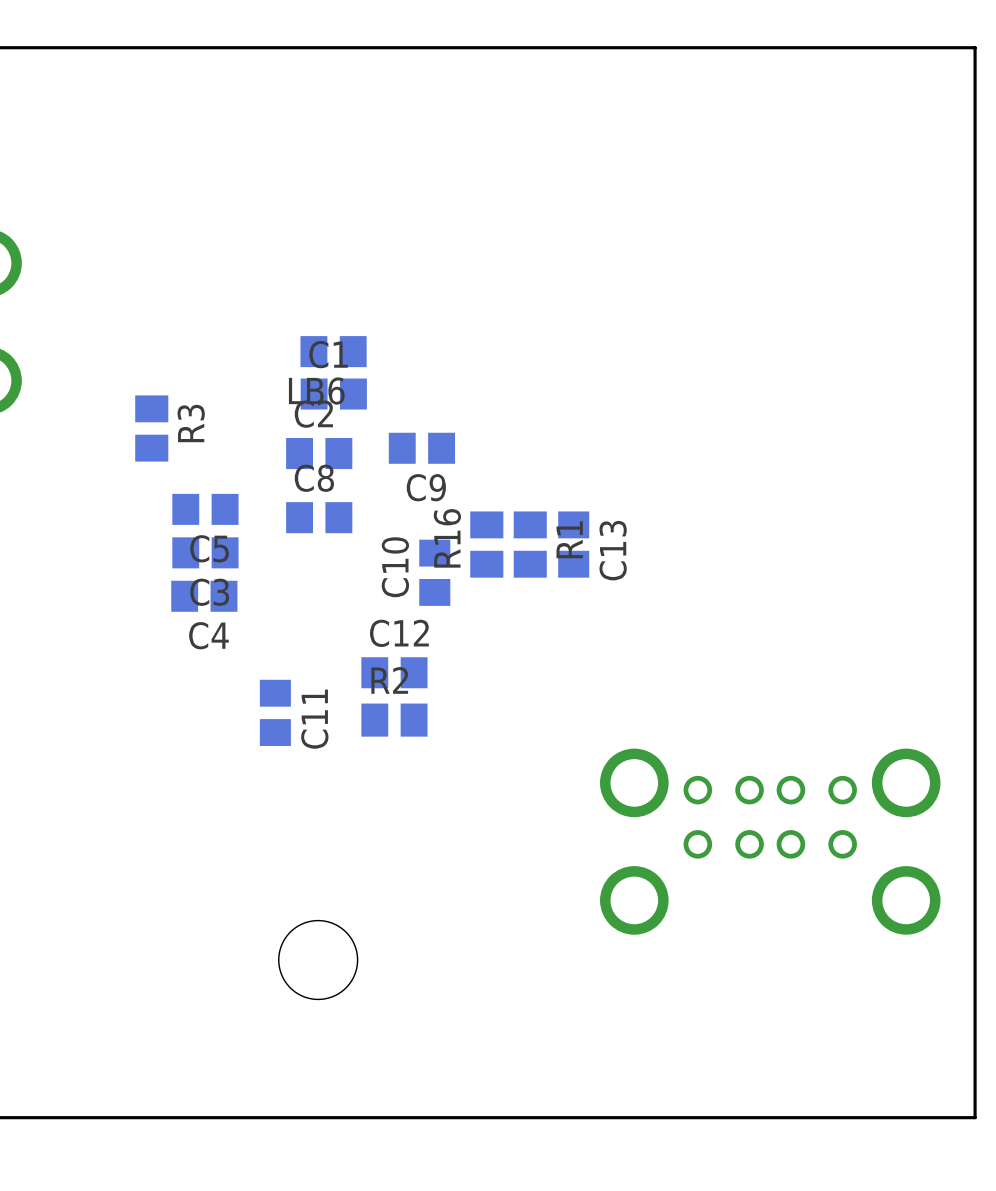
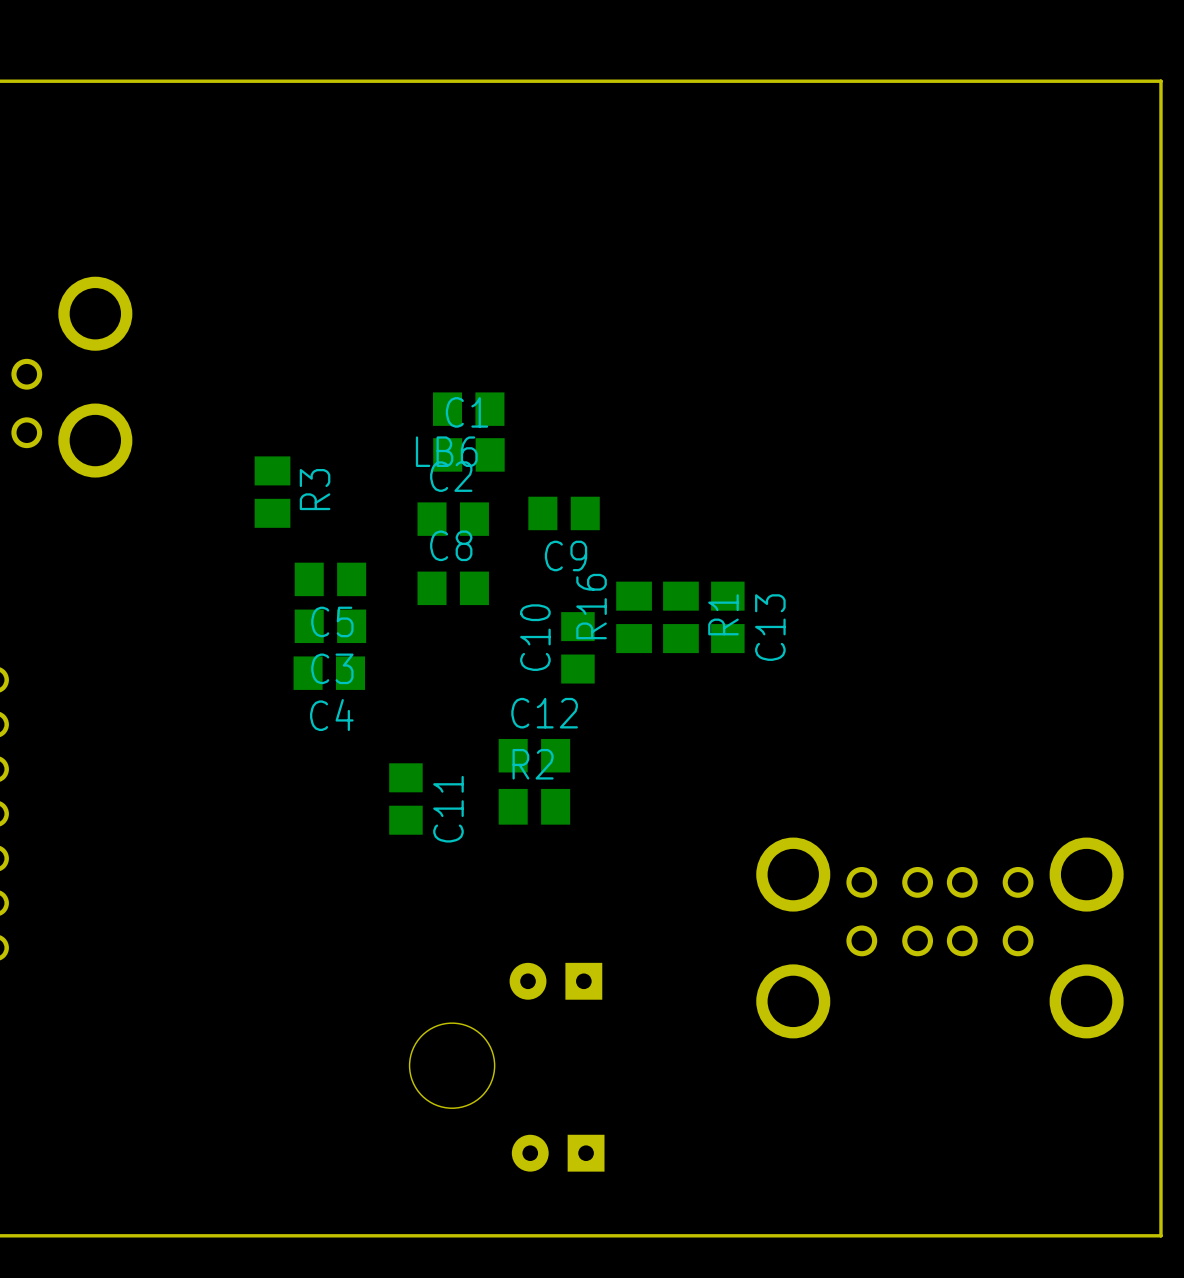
part: none -> (555, 981)
part: none -> (558, 1153)

